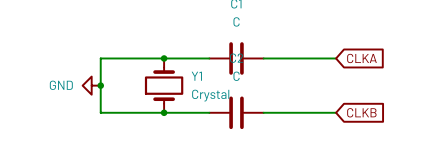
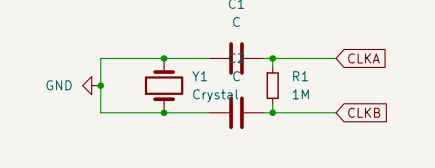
wire: none -> (272, 58) (272, 67)
junction: none -> (272, 58)
R1: none -> 1M (272, 85)
wire: none -> (272, 103) (272, 112)
junction: none -> (272, 112)

